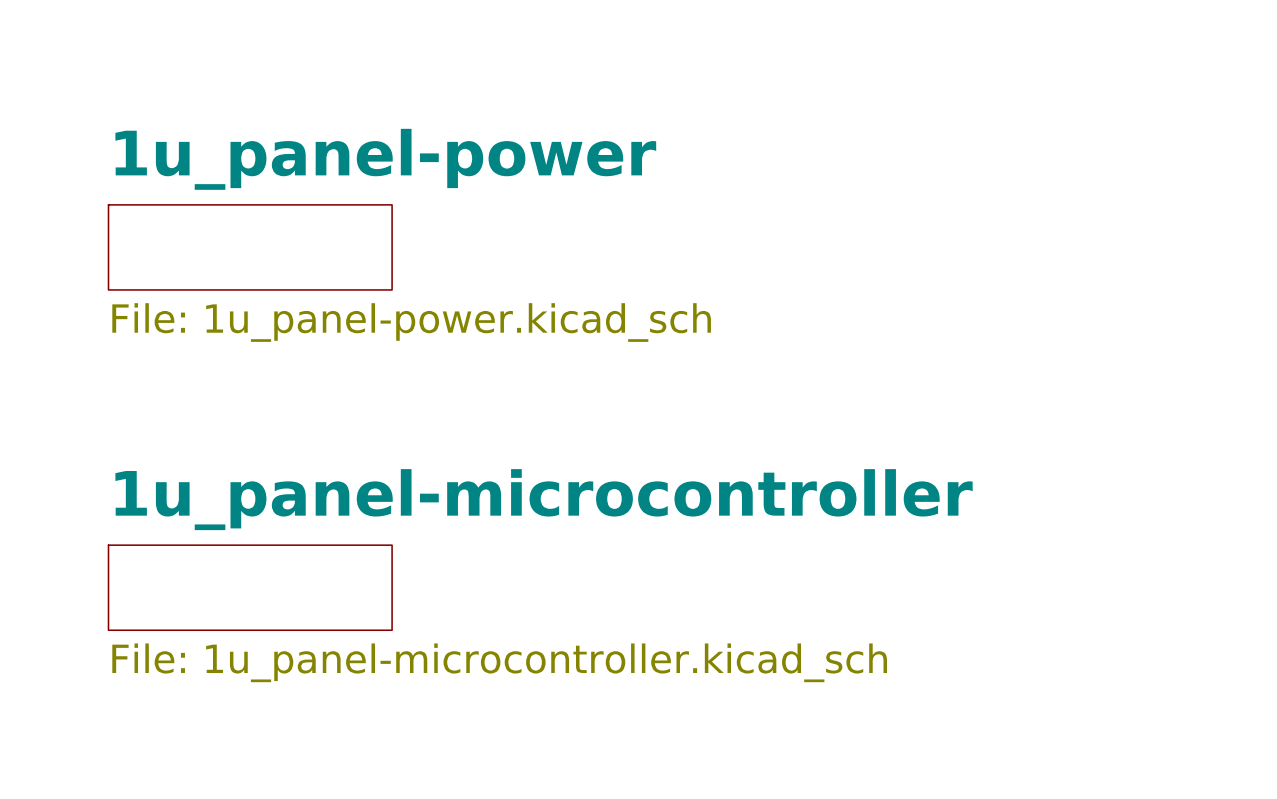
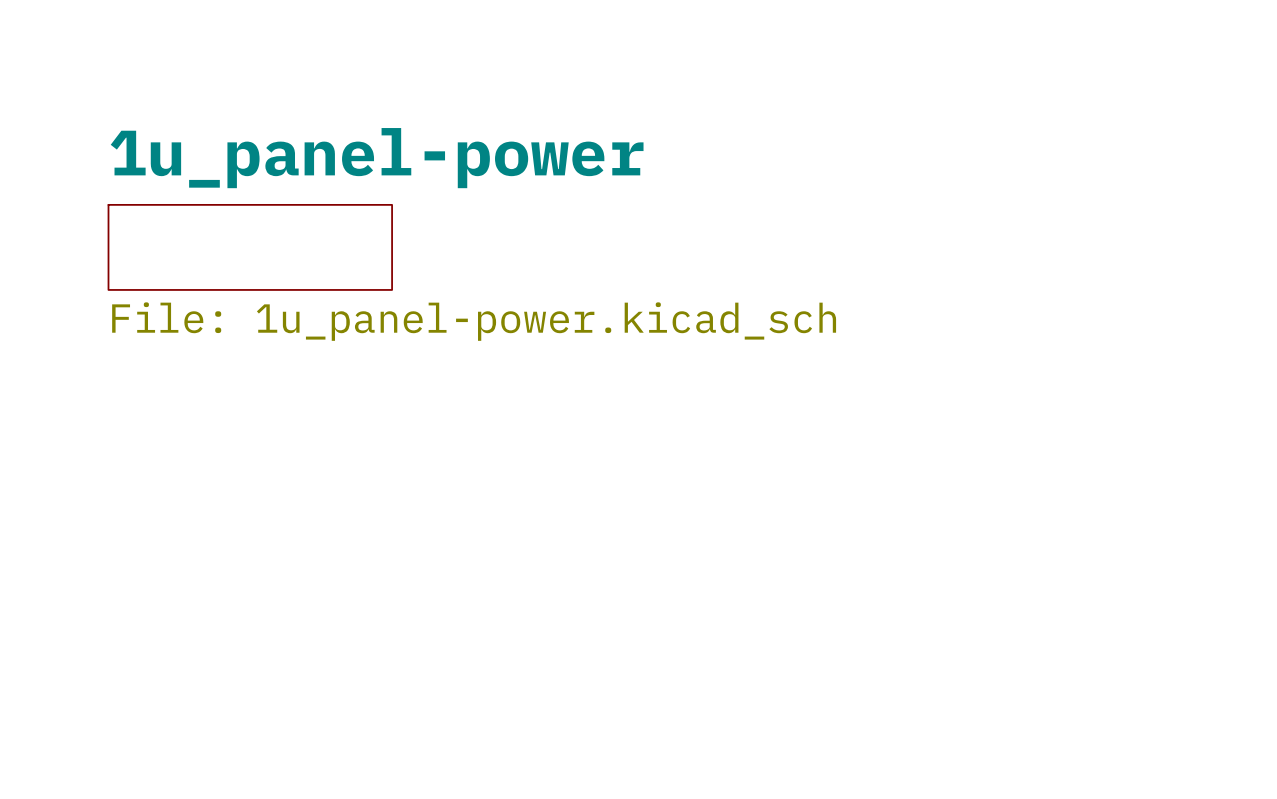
sheet 1u_panel-microcontroller: File: 1u_panel-microcontroller.kicad_sch (250, 587) -> none

